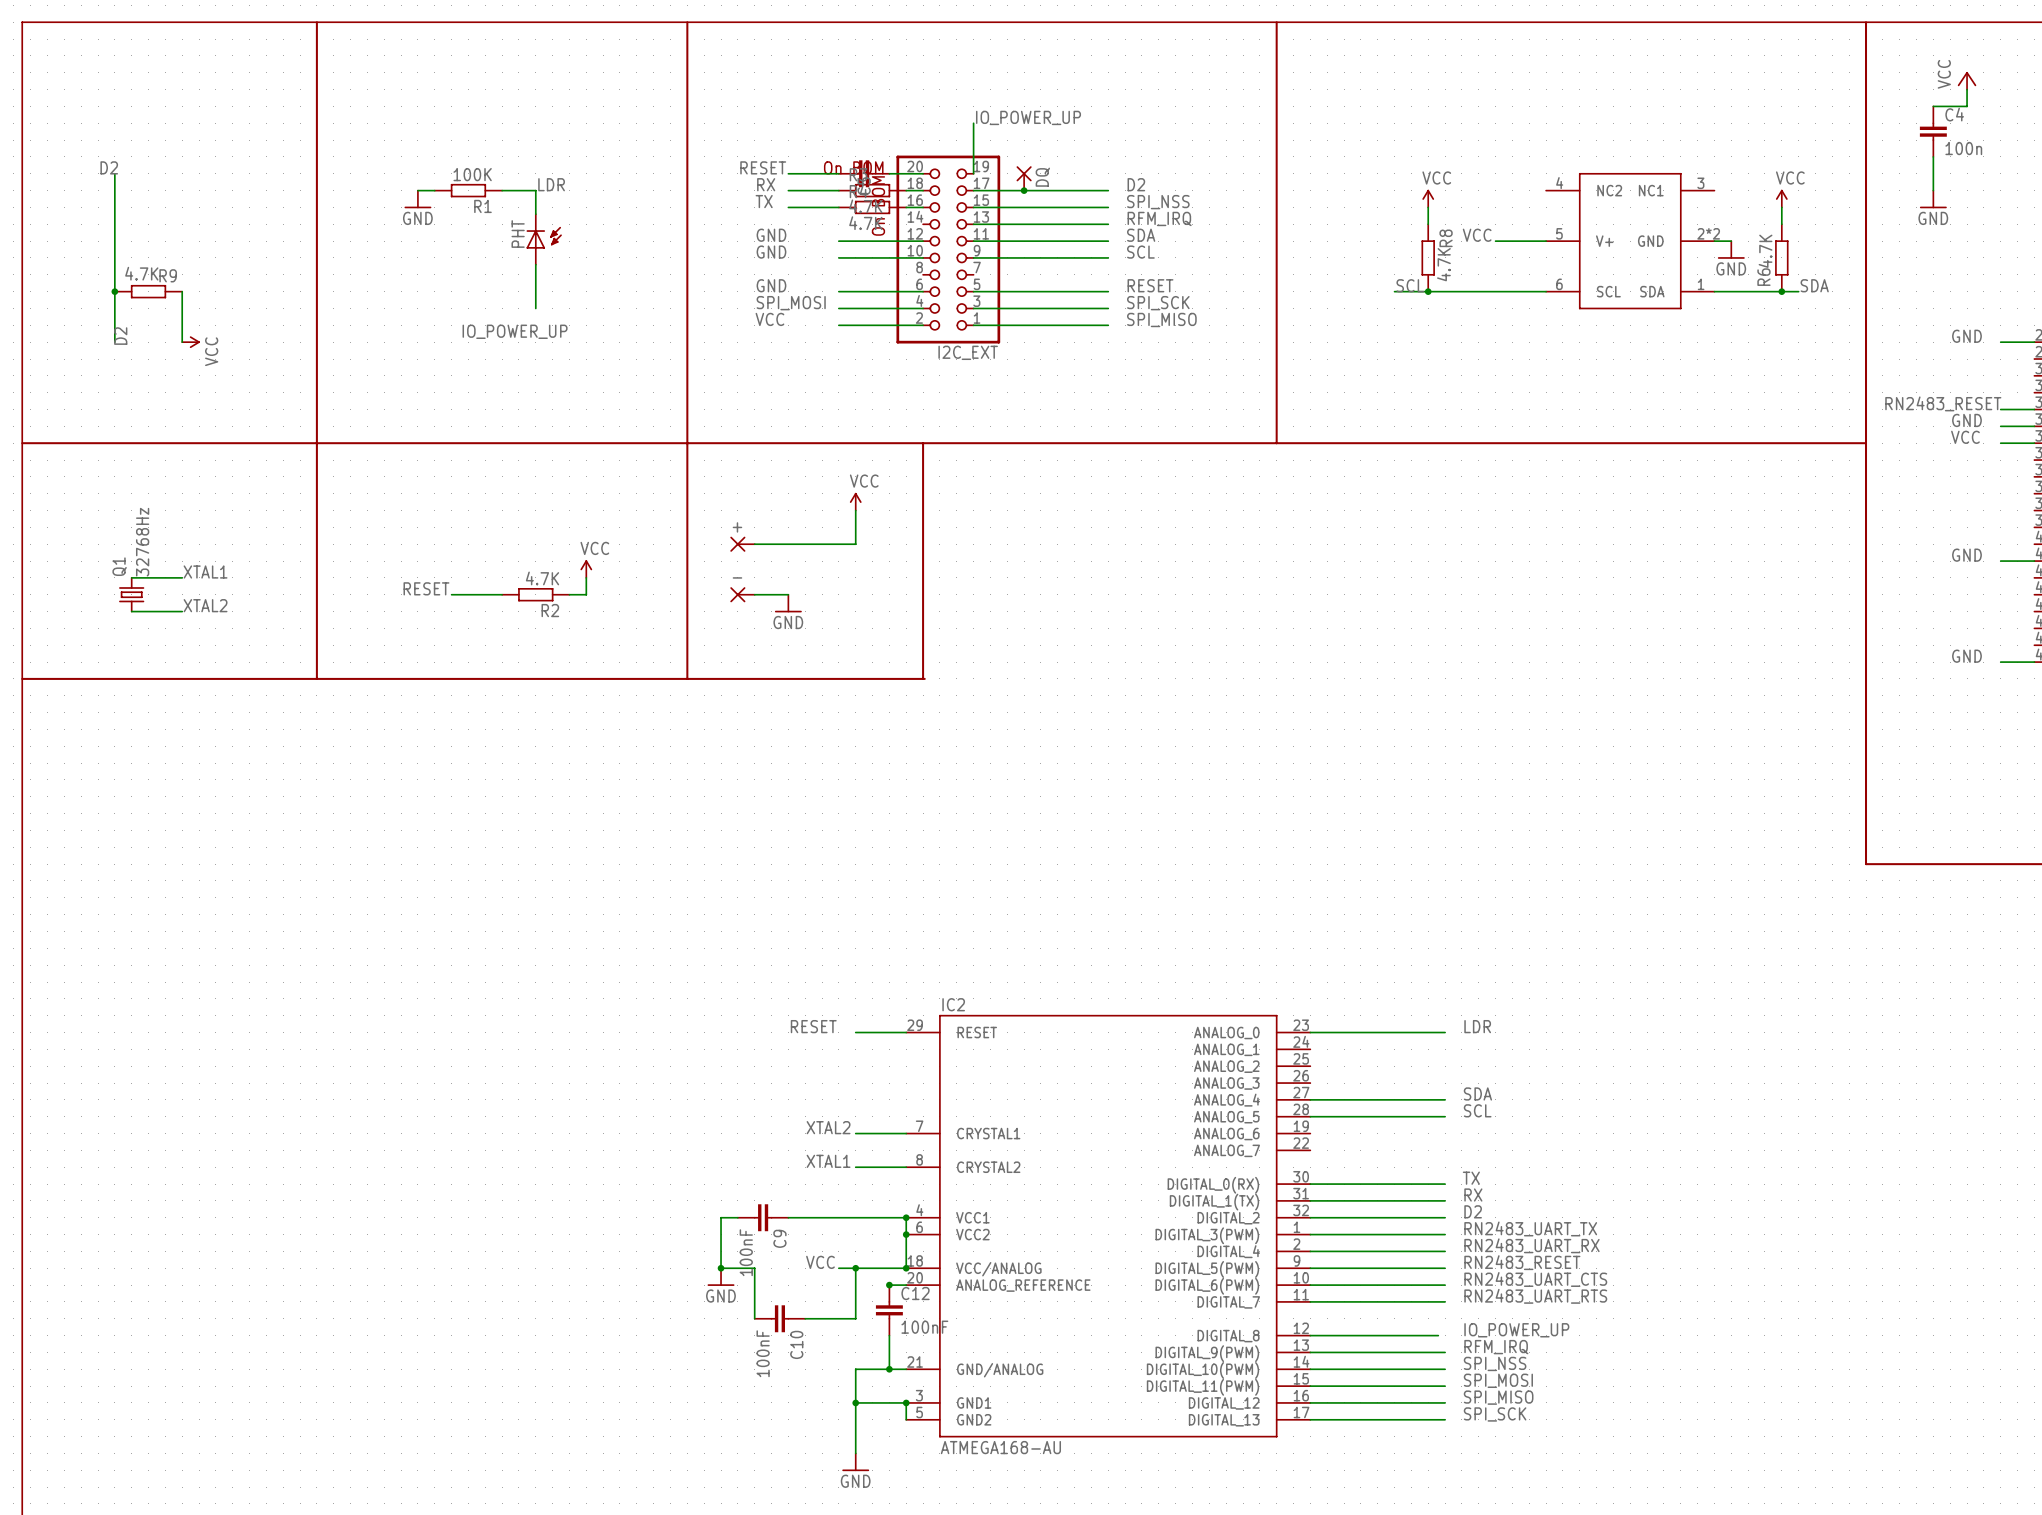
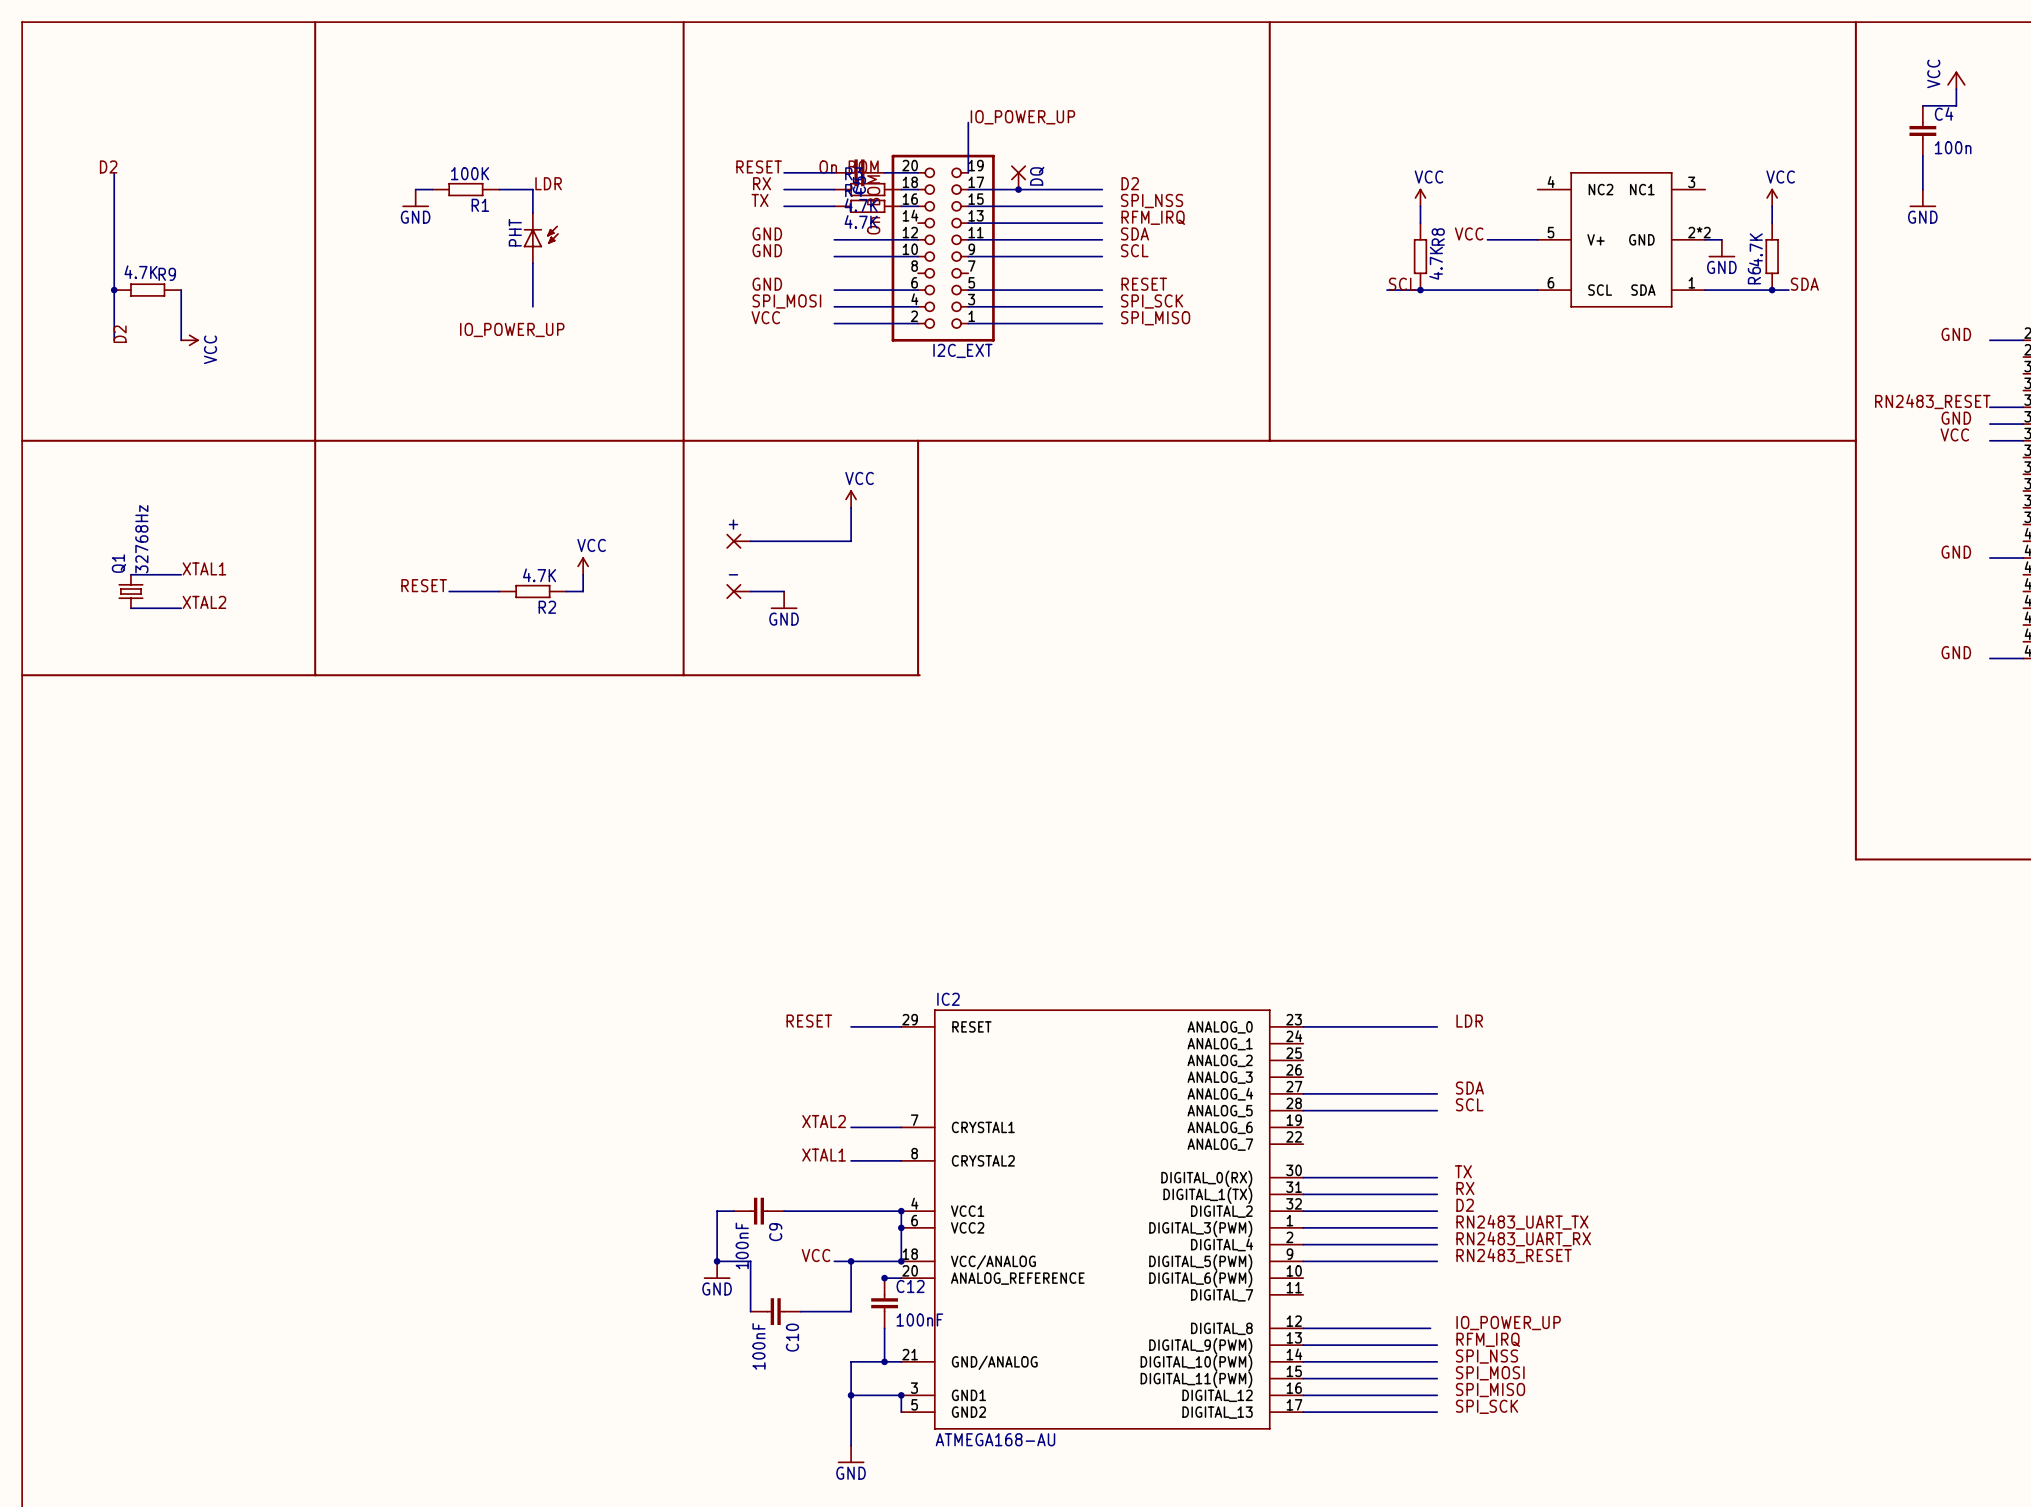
label: RN2483_UART_CTS (1535, 1279) -> none
wire: (1310, 1285) (1445, 1285) -> none
label: RN2483_UART_RTS (1535, 1296) -> none
wire: (1310, 1301) (1445, 1301) -> none

